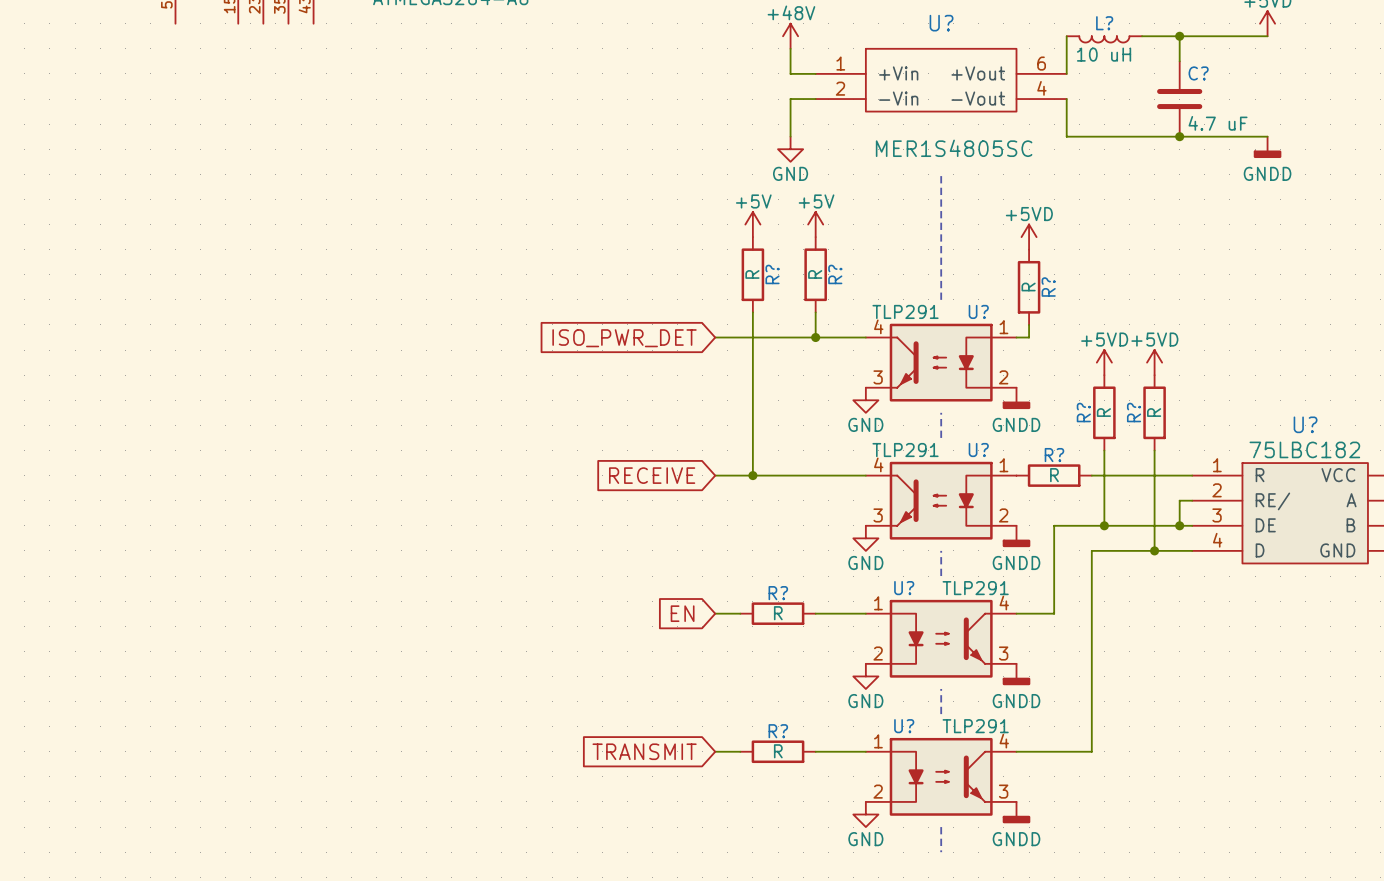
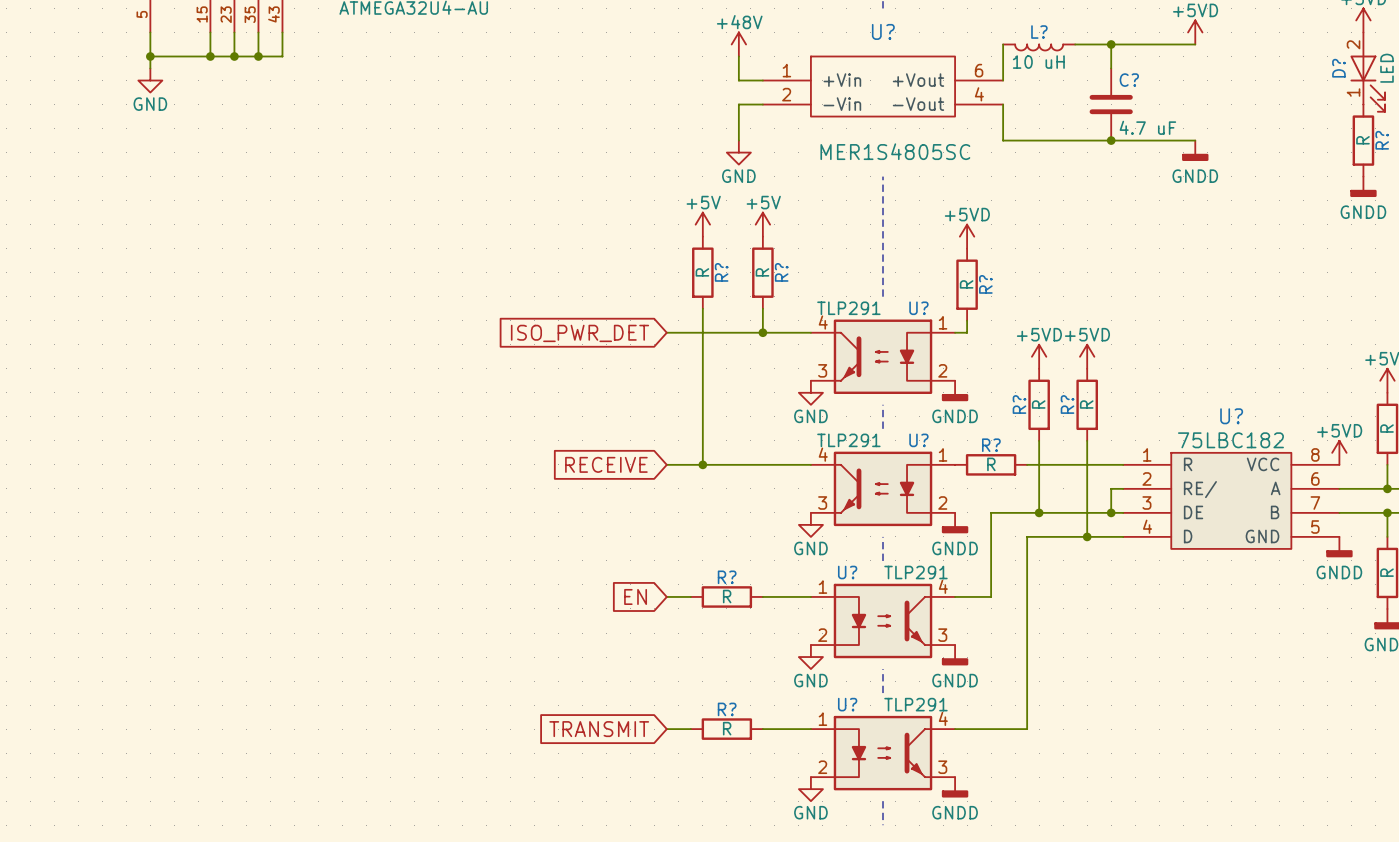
wire: none -> (150, 32) (150, 68)
wire: none -> (210, 32) (210, 56)
wire: none -> (234, 32) (234, 56)
wire: none -> (258, 32) (258, 56)
wire: none -> (282, 32) (282, 56) (150, 56)
junction: none -> (150, 56)
junction: none -> (210, 56)
junction: none -> (234, 56)
junction: none -> (258, 56)
power symbol: none -> GND (150, 80)

